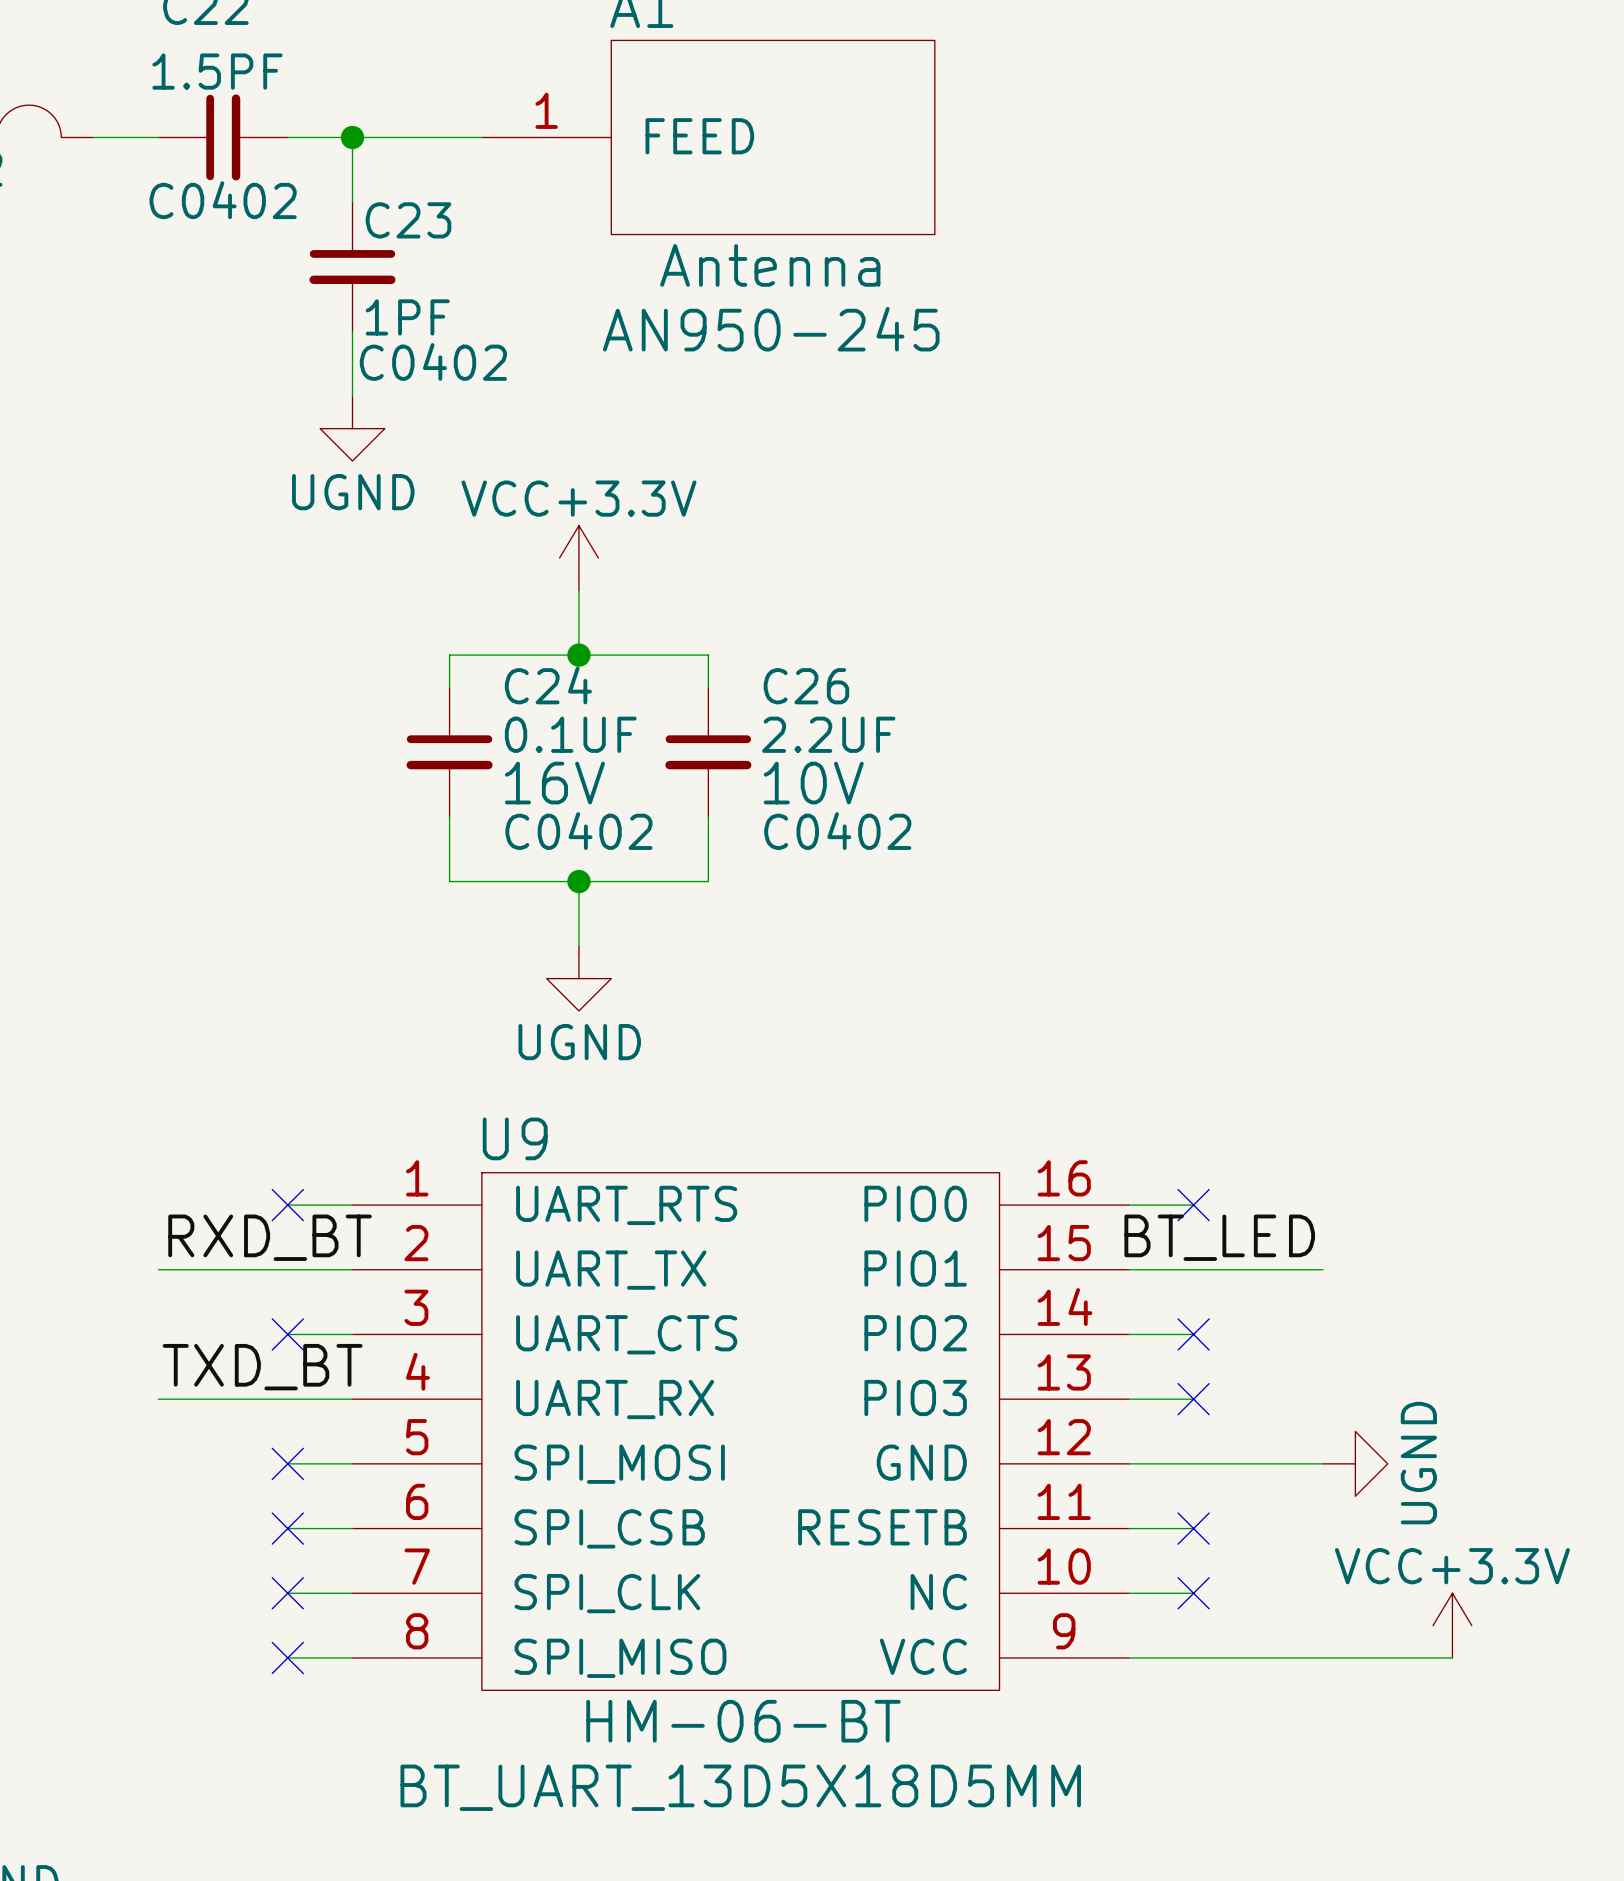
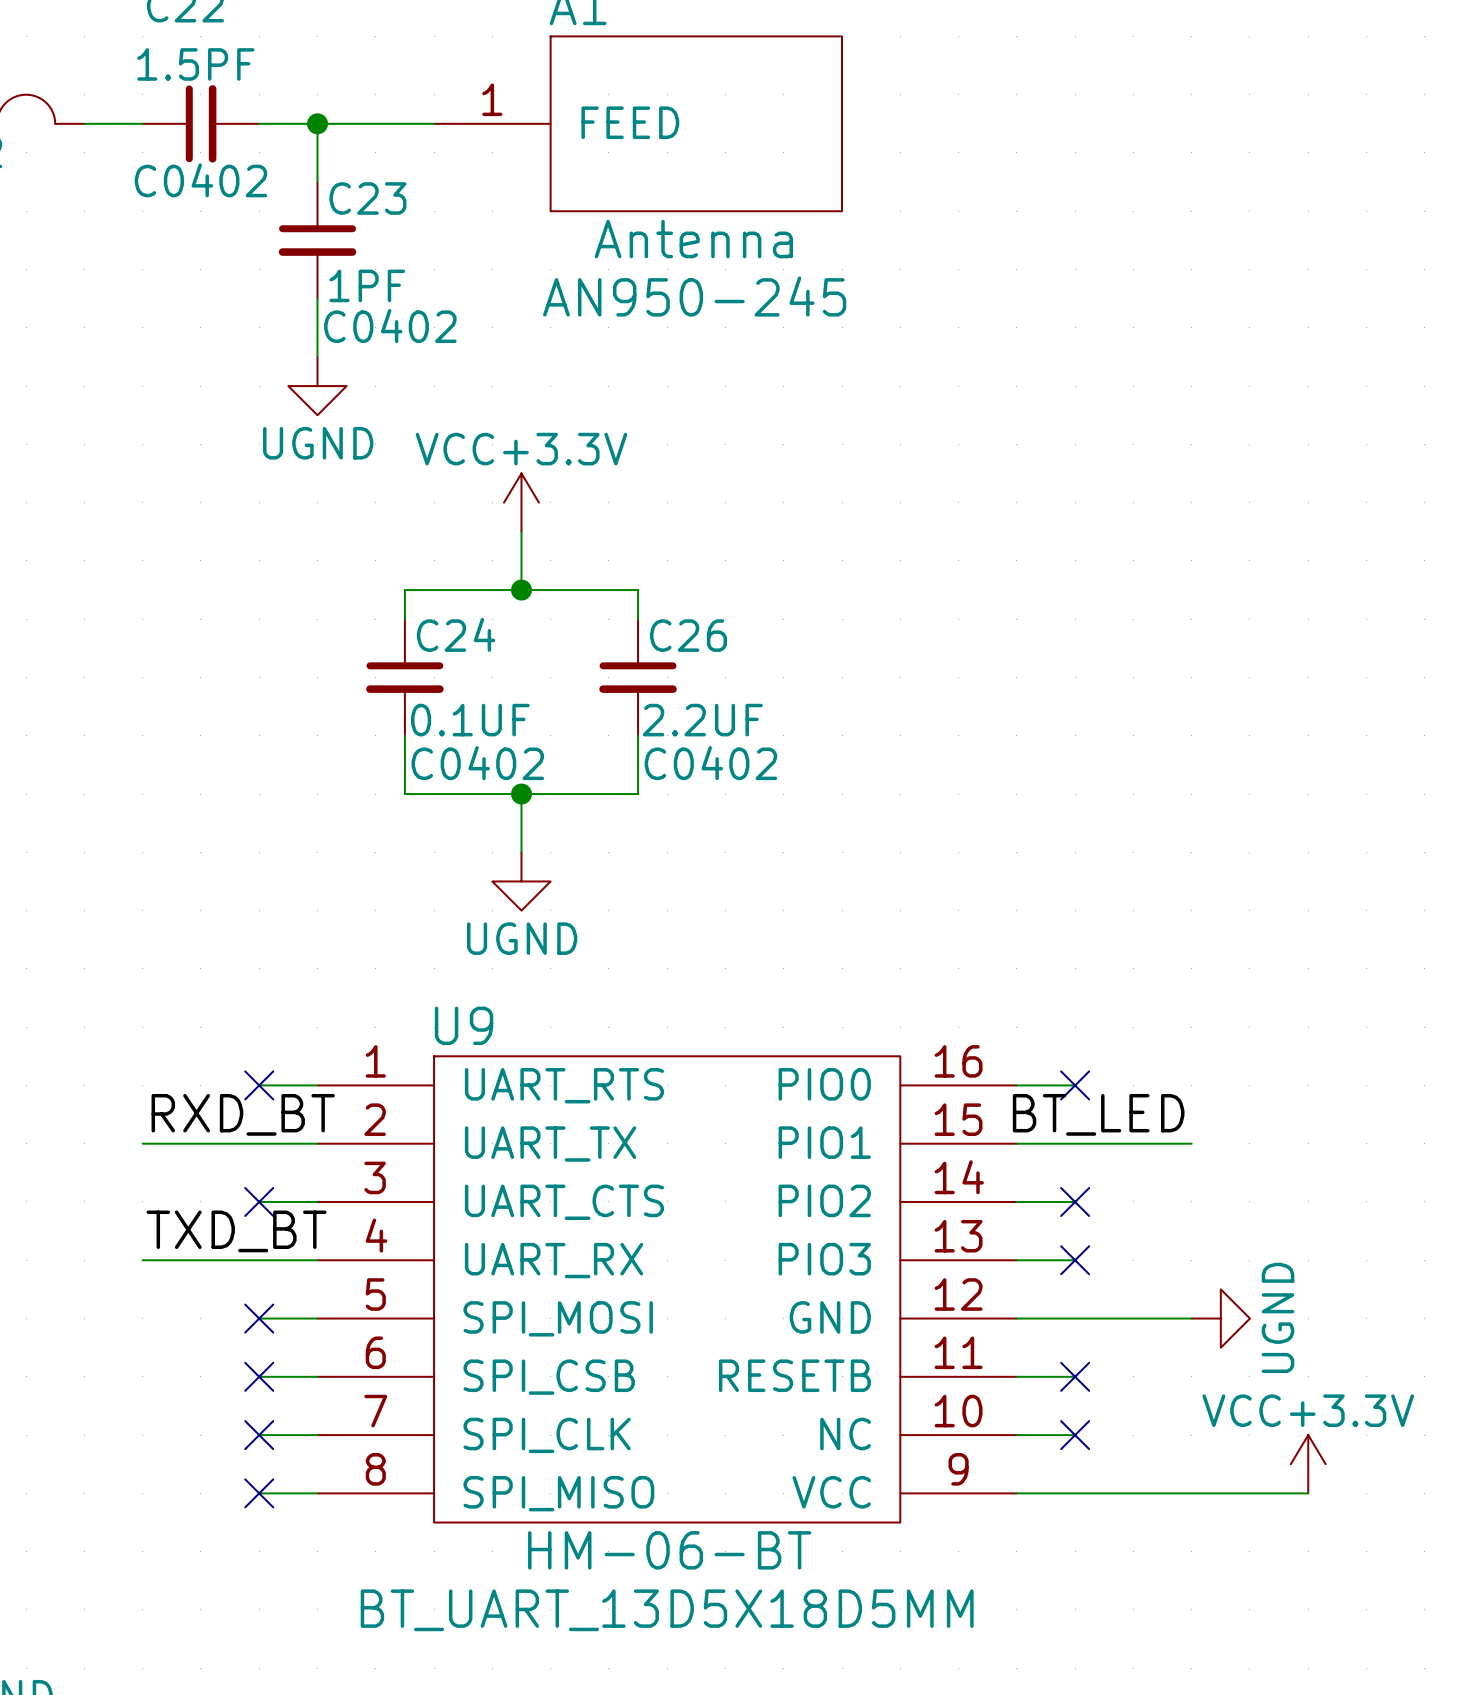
C24 name position: C24 (548, 685) -> C24 (456, 634)
C26 name position: C26 (806, 686) -> C26 (688, 635)
C24 value position: 0.1UF (570, 734) -> 0.1UF (470, 720)
C26 value position: 2.2UF (828, 734) -> 2.2UF (702, 720)
C24 text: 16V (554, 783) -> none
C26 text: 10V (813, 783) -> none
C24 text position: C0402 (578, 831) -> C0402 (477, 763)
C26 text position: C0402 (837, 831) -> C0402 (710, 763)

